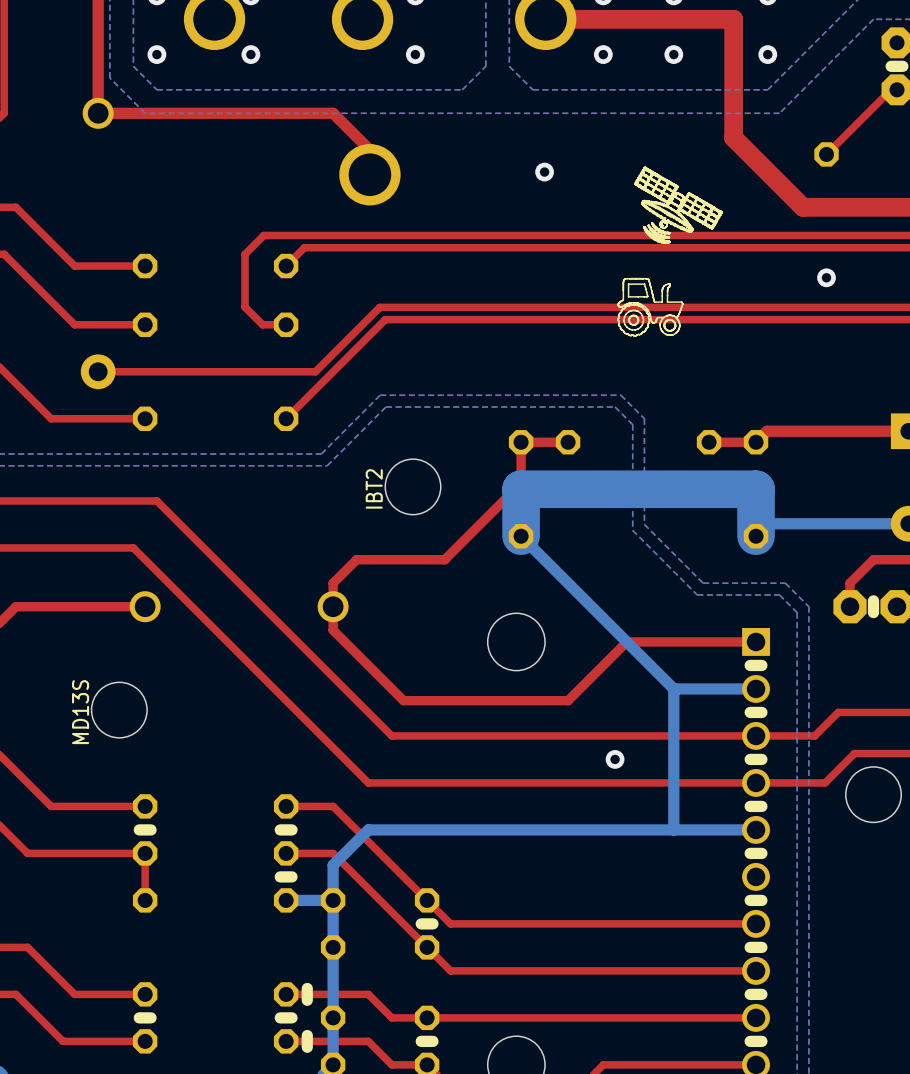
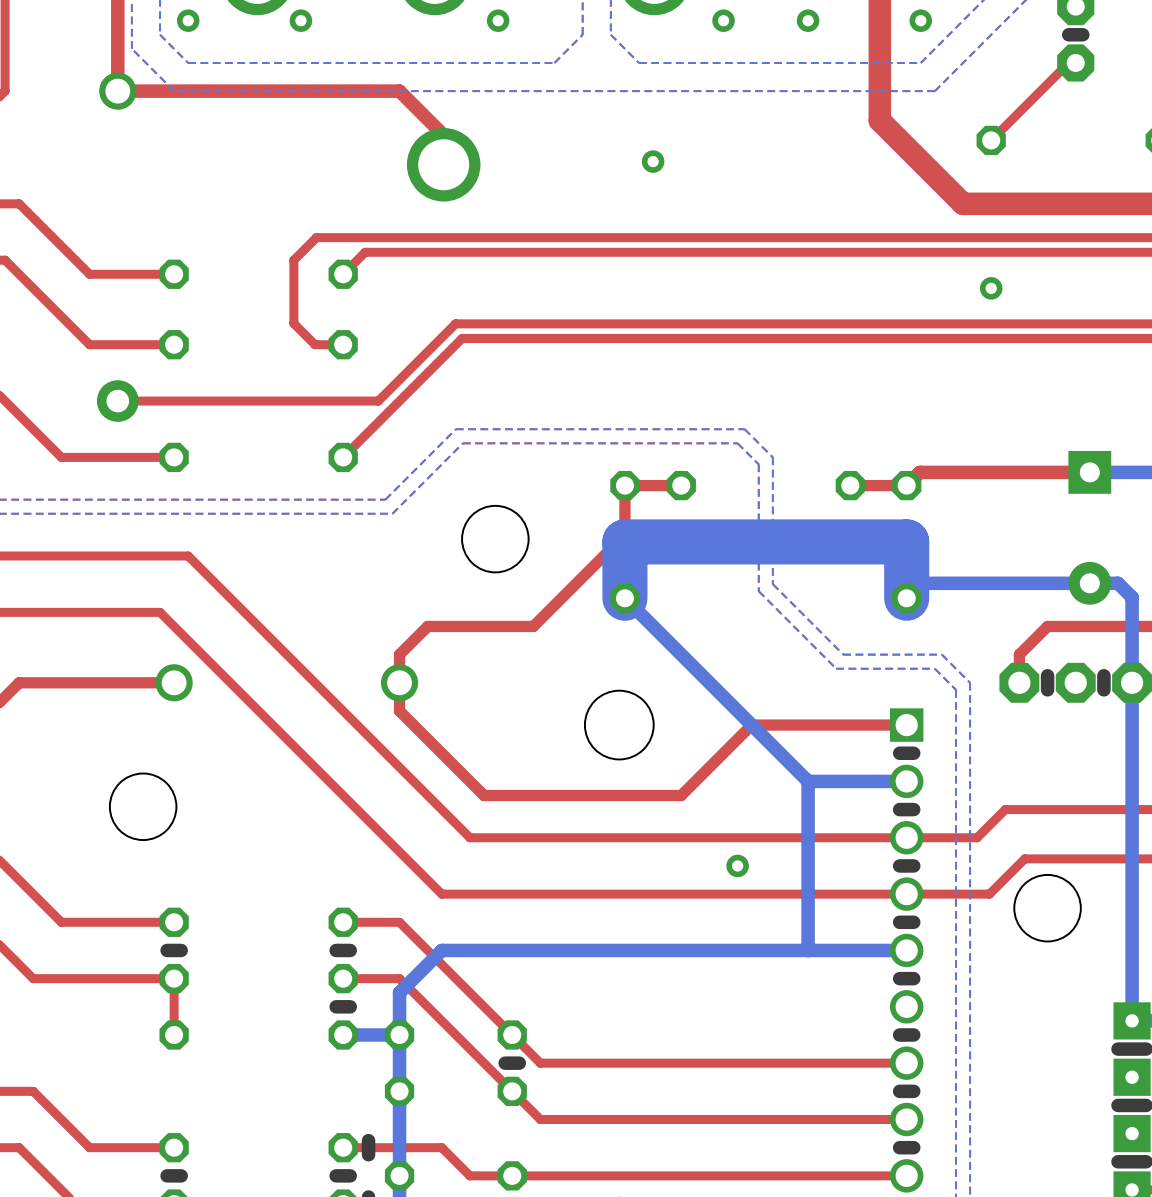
drawing: [635, 167, 723, 243] -> none
drawing: [617, 277, 684, 337] -> none
text: IBT2 (374, 488) -> none
text: MD13S (80, 712) -> none

